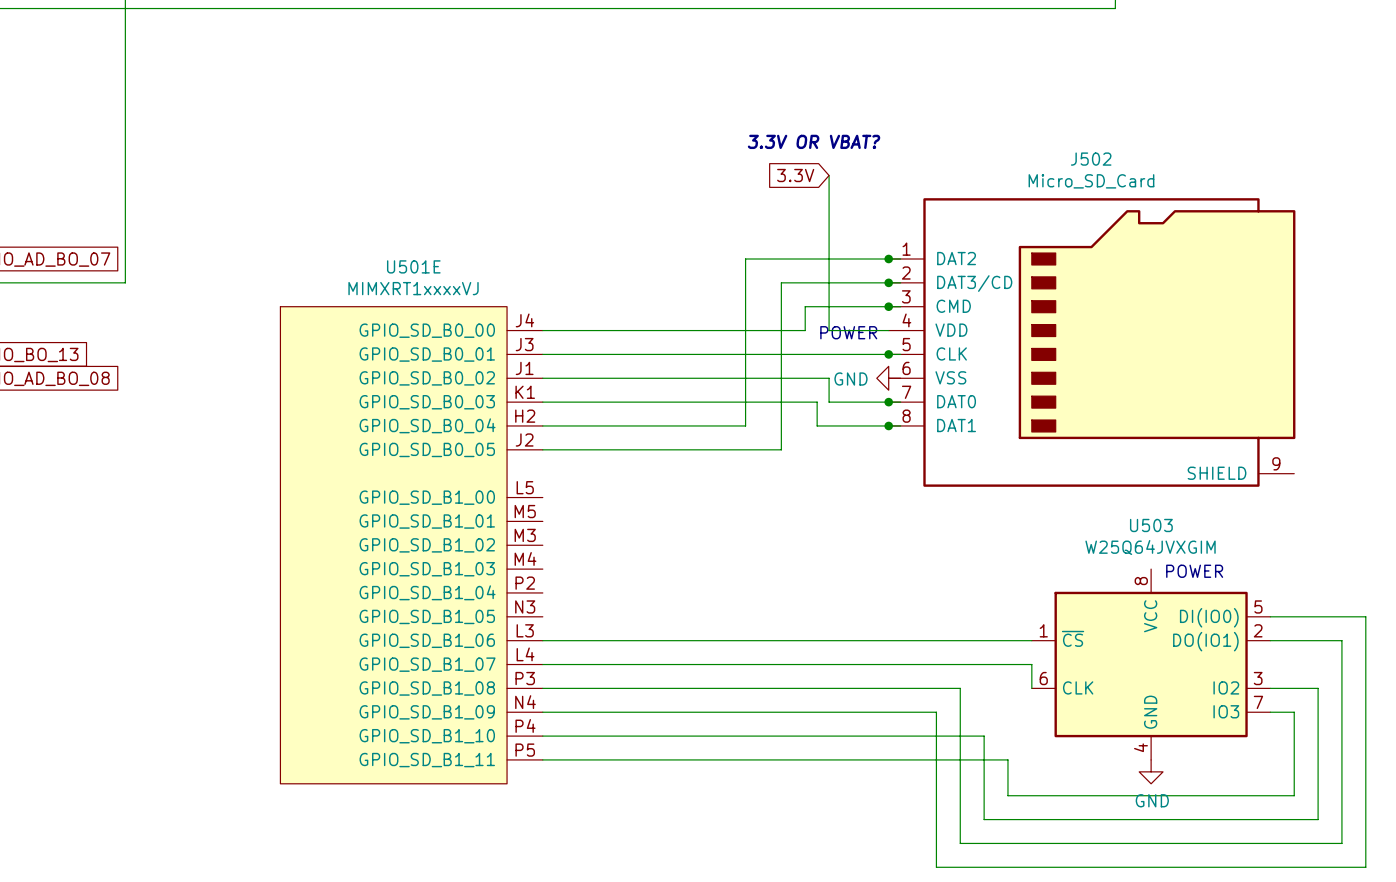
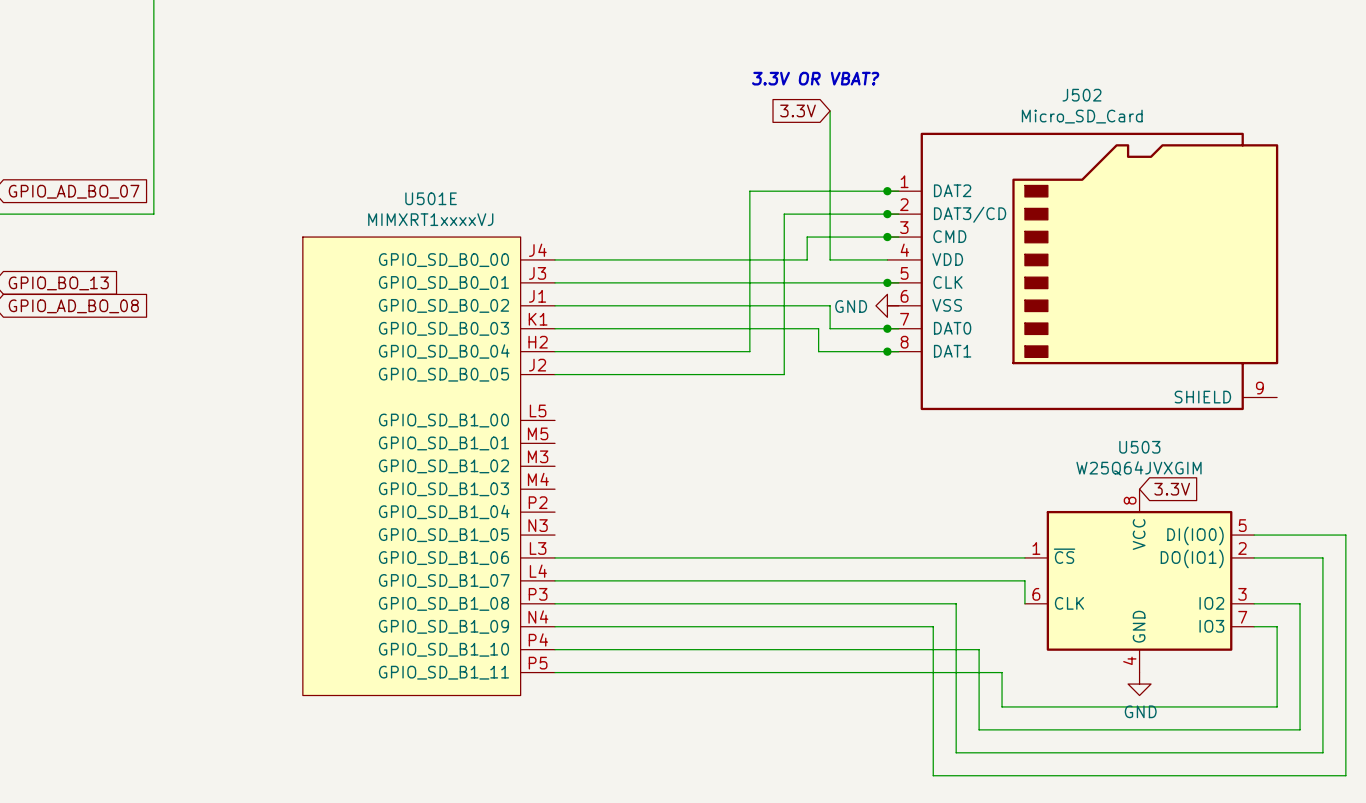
text: POWER (848, 332) -> none
global label: none -> 3.3V (1172, 489)
text: POWER (1194, 571) -> none

